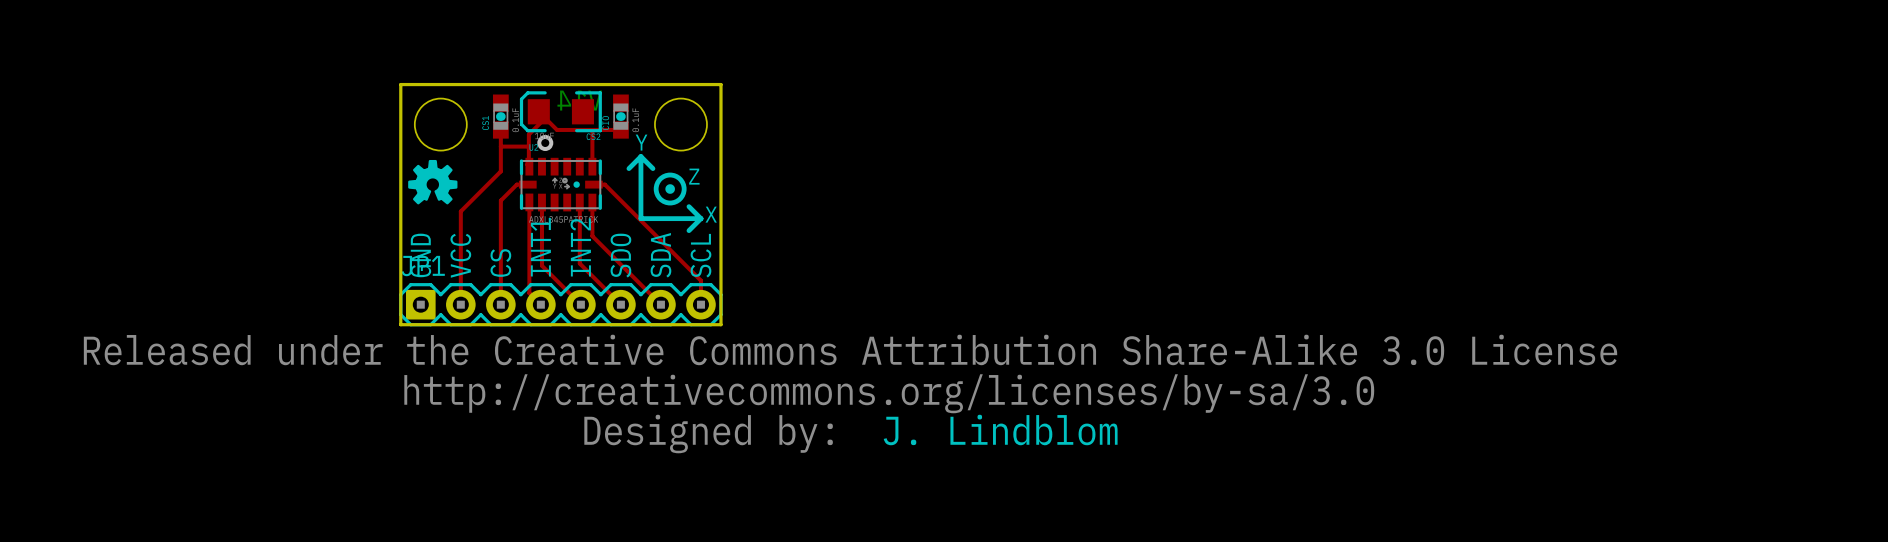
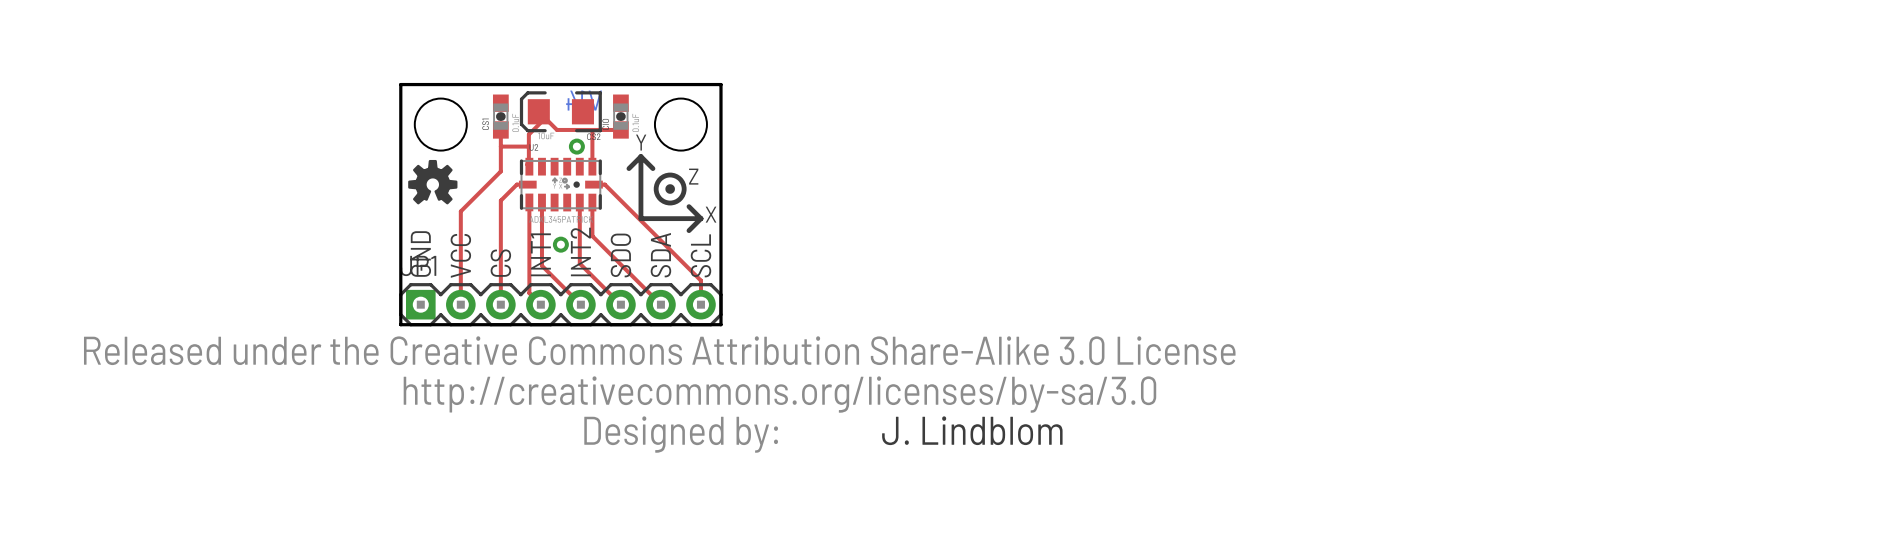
via position: (545, 142) -> (576, 146)
via: none -> (560, 244)

